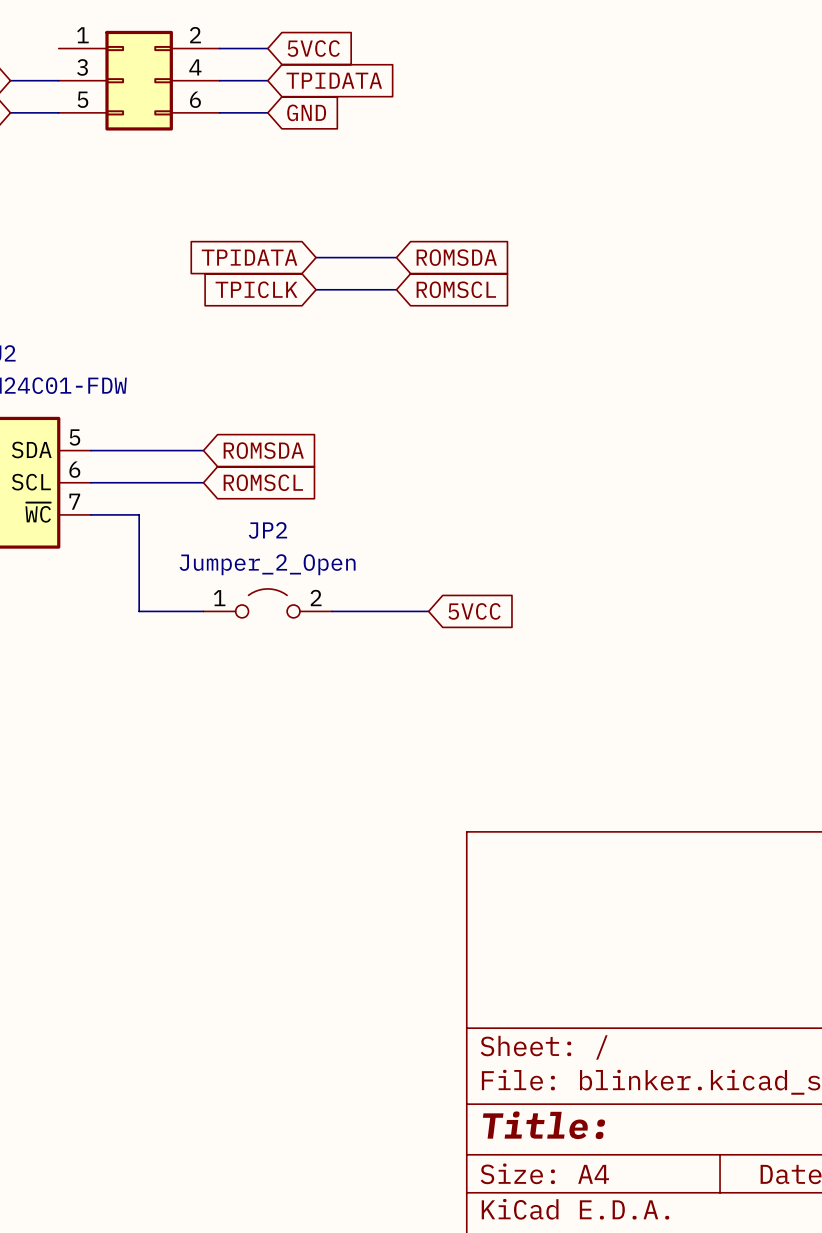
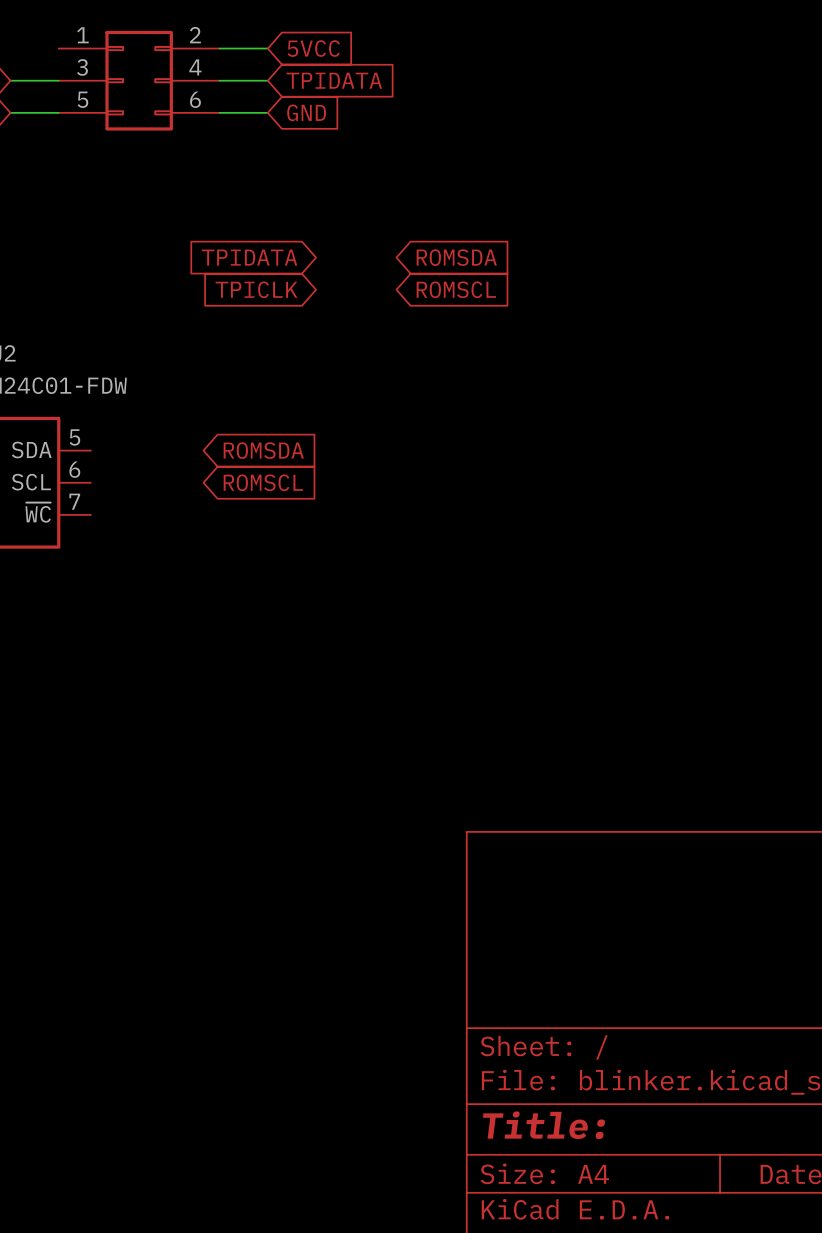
wire: (316, 257) (396, 257) -> none
wire: (316, 289) (396, 289) -> none
wire: (90, 450) (203, 450) -> none
wire: (90, 482) (203, 482) -> none
wire: (90, 514) (139, 514) (139, 611) (203, 611) -> none
JP2: Jumper_2_Open (267, 603) -> none
wire: (332, 611) (428, 611) -> none
global label: 5VCC (474, 611) -> none

